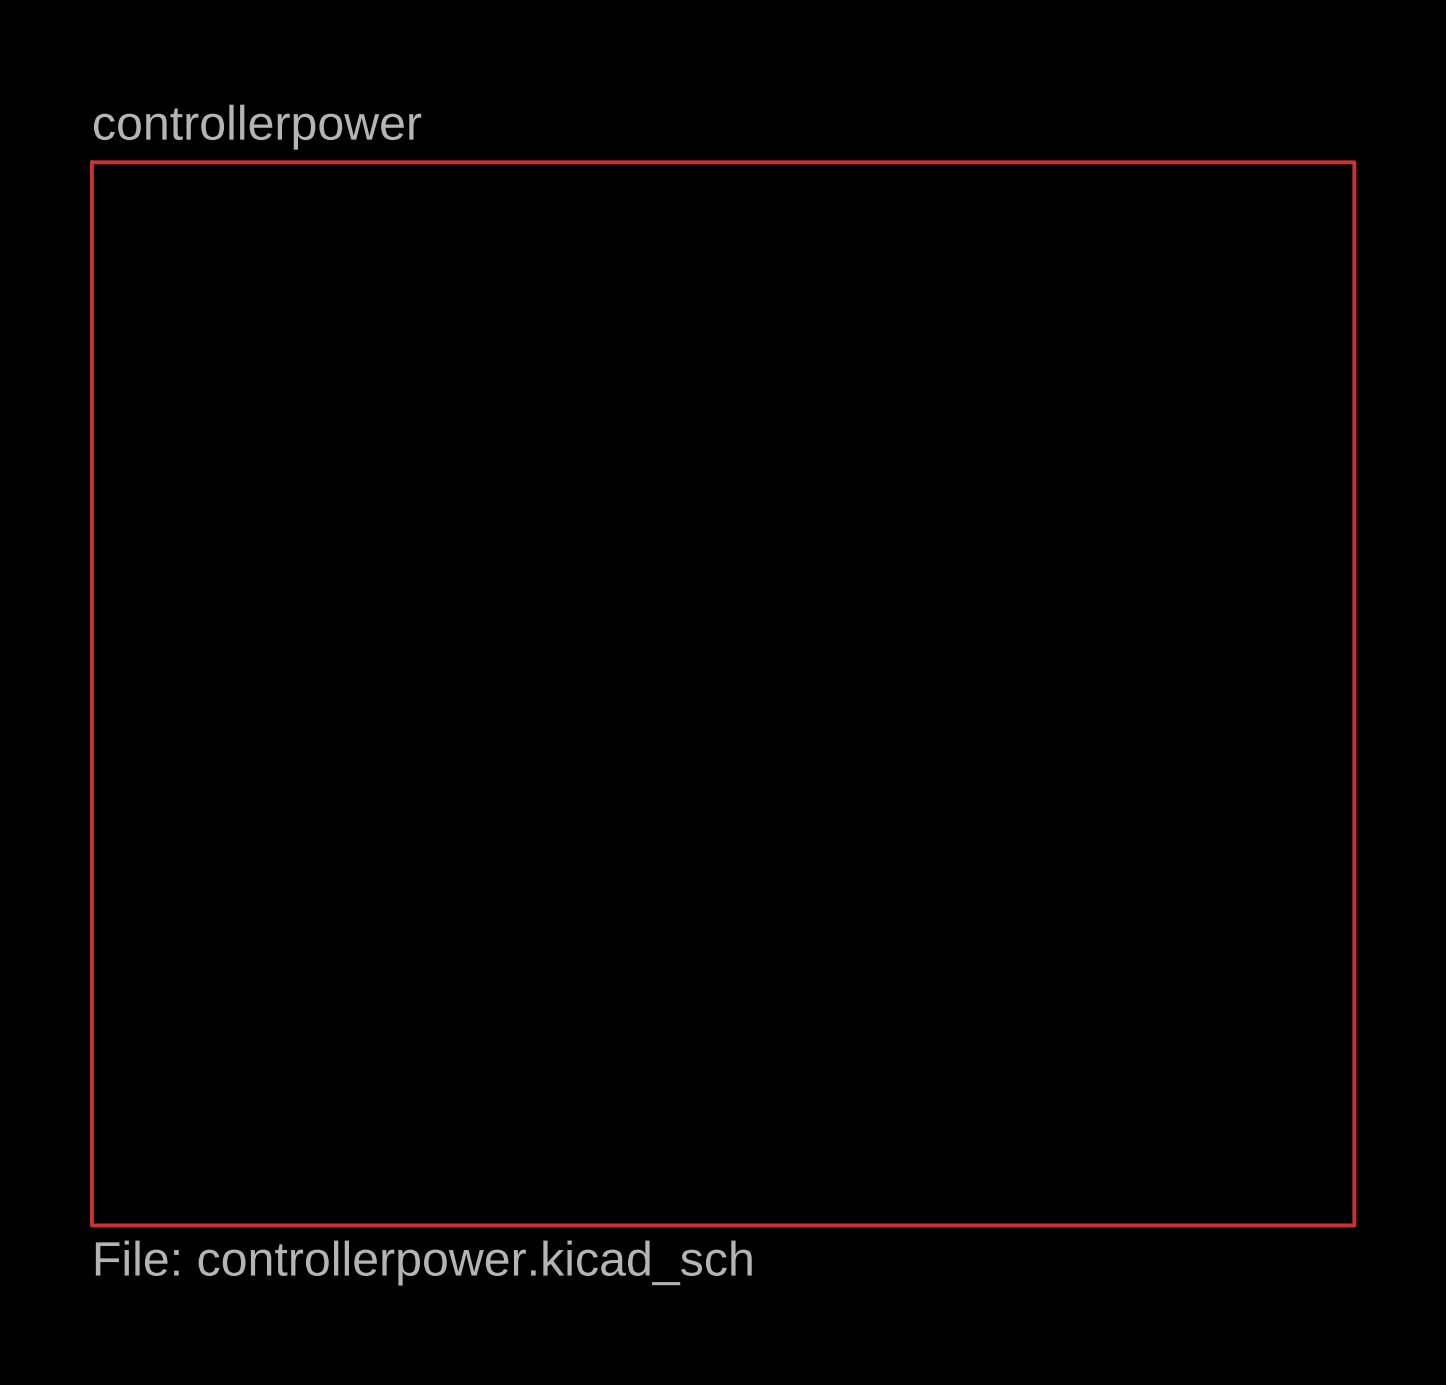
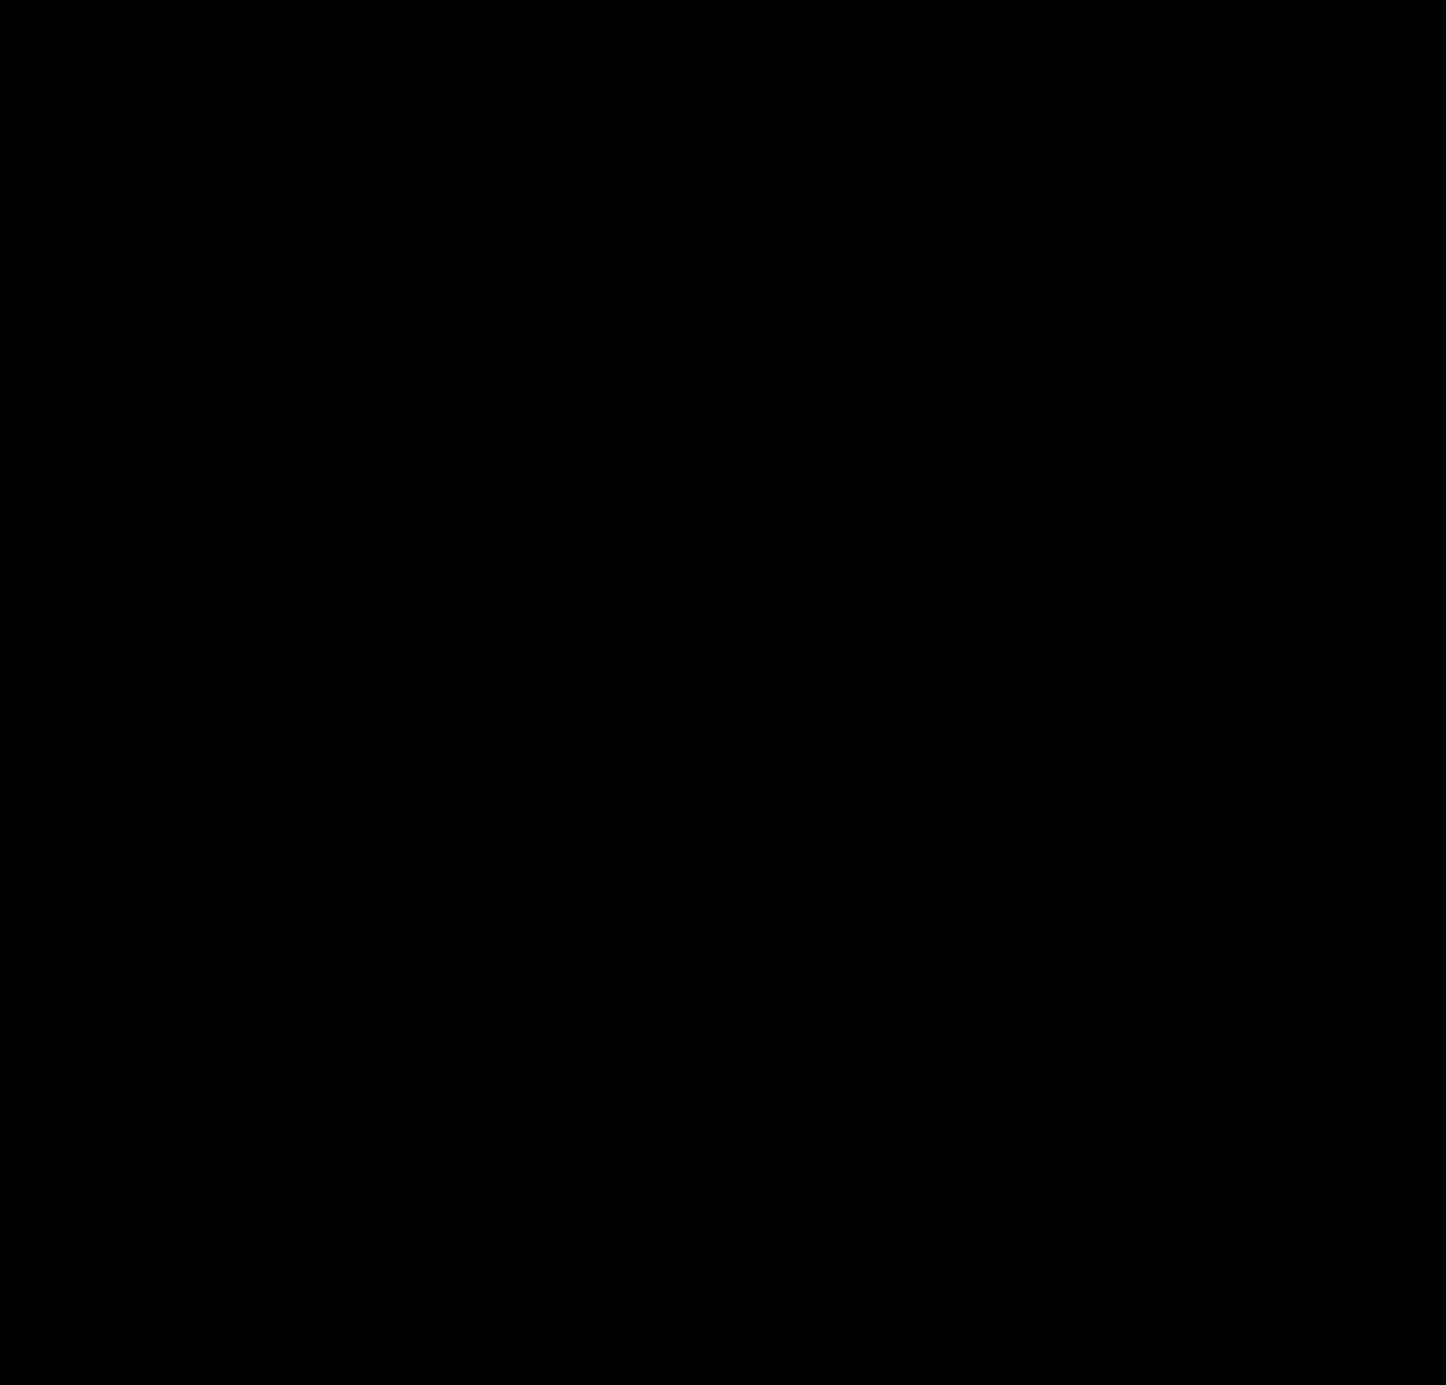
sheet controllerpower: File: controllerpower.kicad_sch (723, 693) -> none

